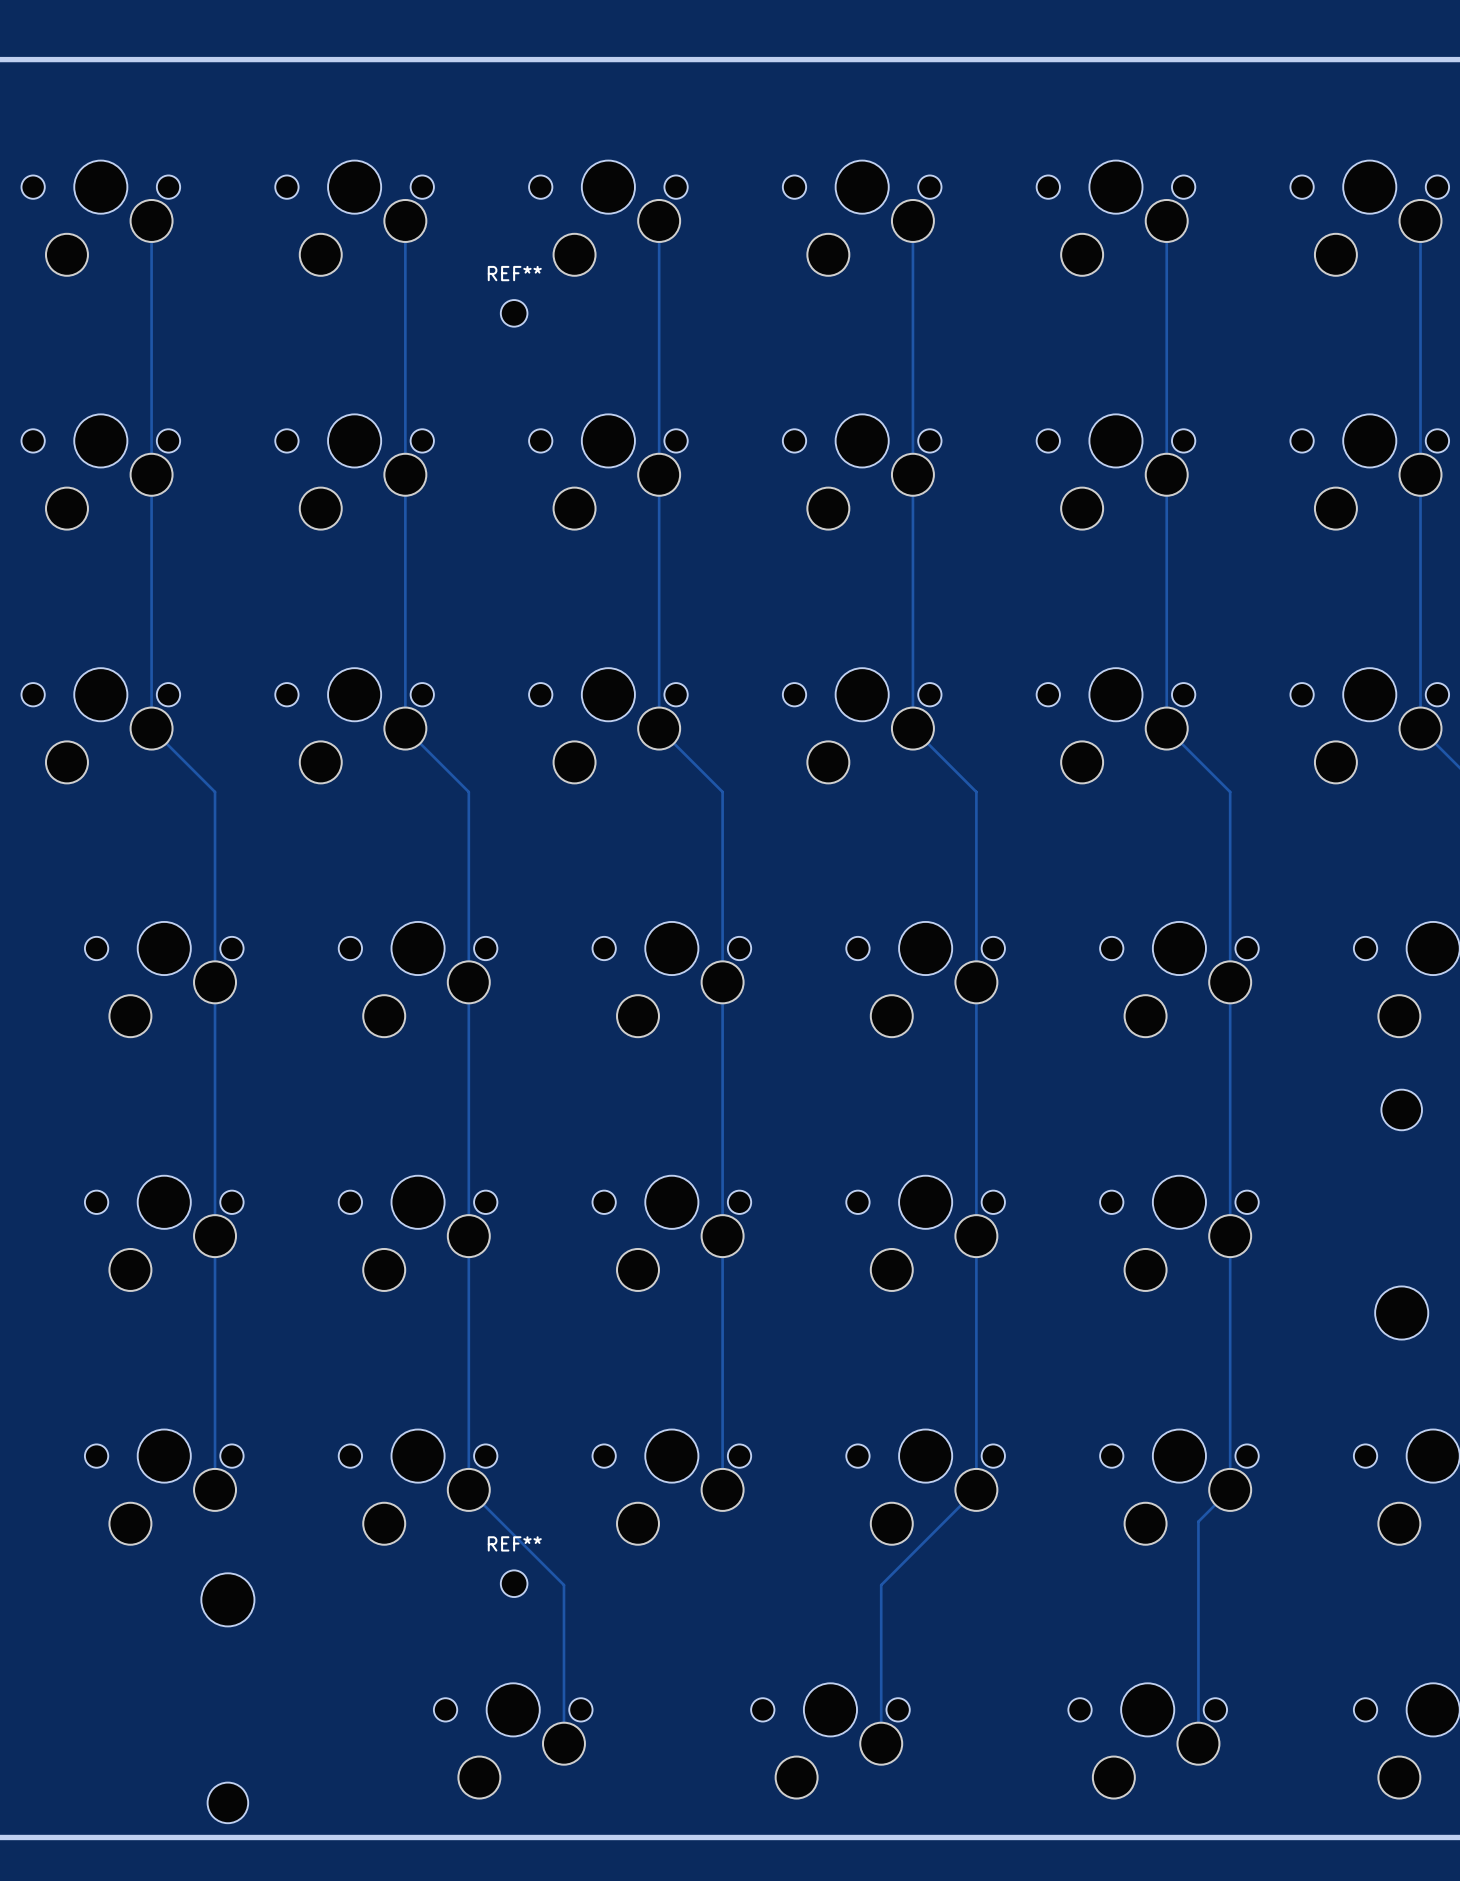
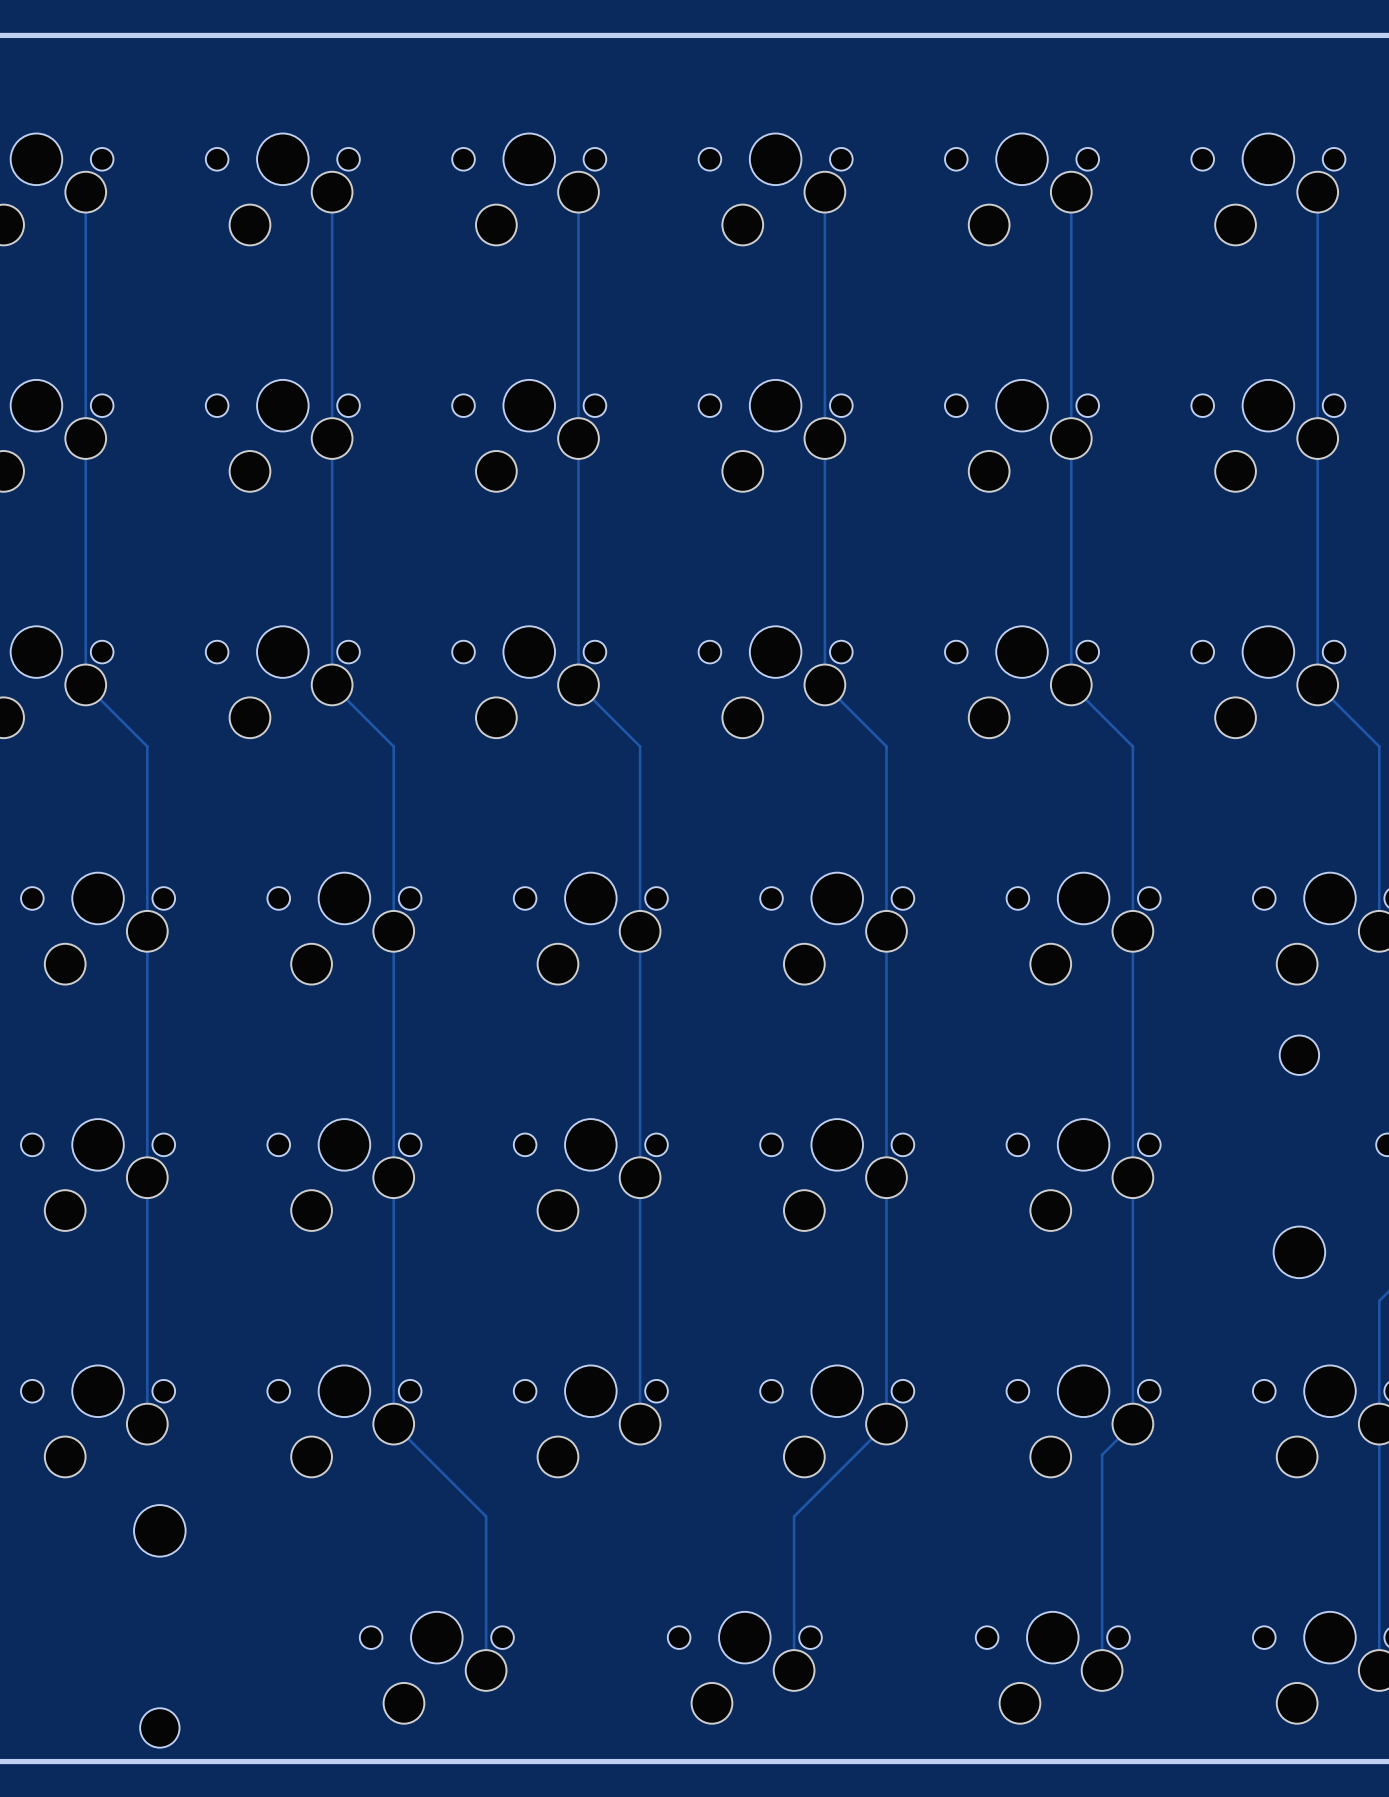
REF**: (514, 313) -> none
REF**: (514, 1583) -> none

